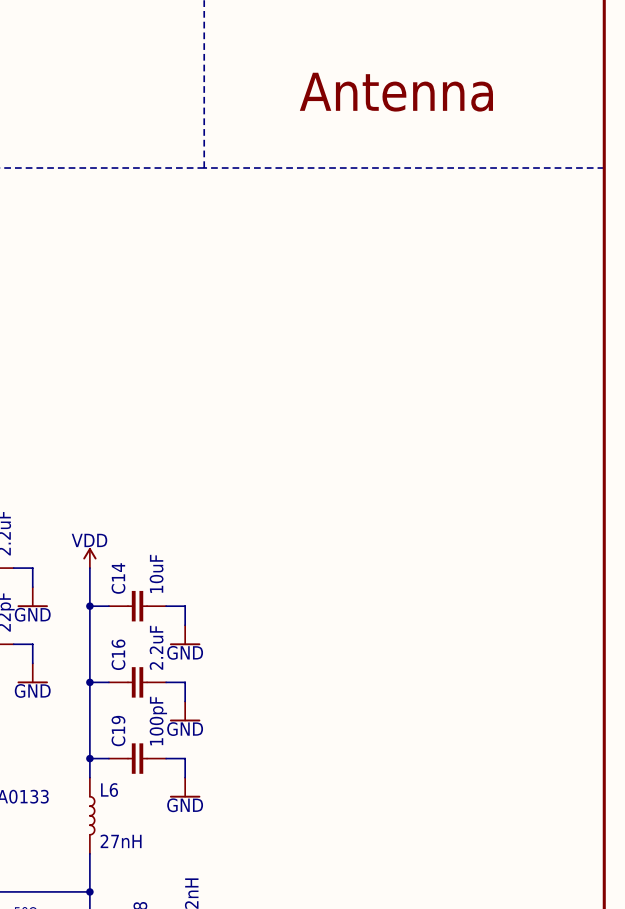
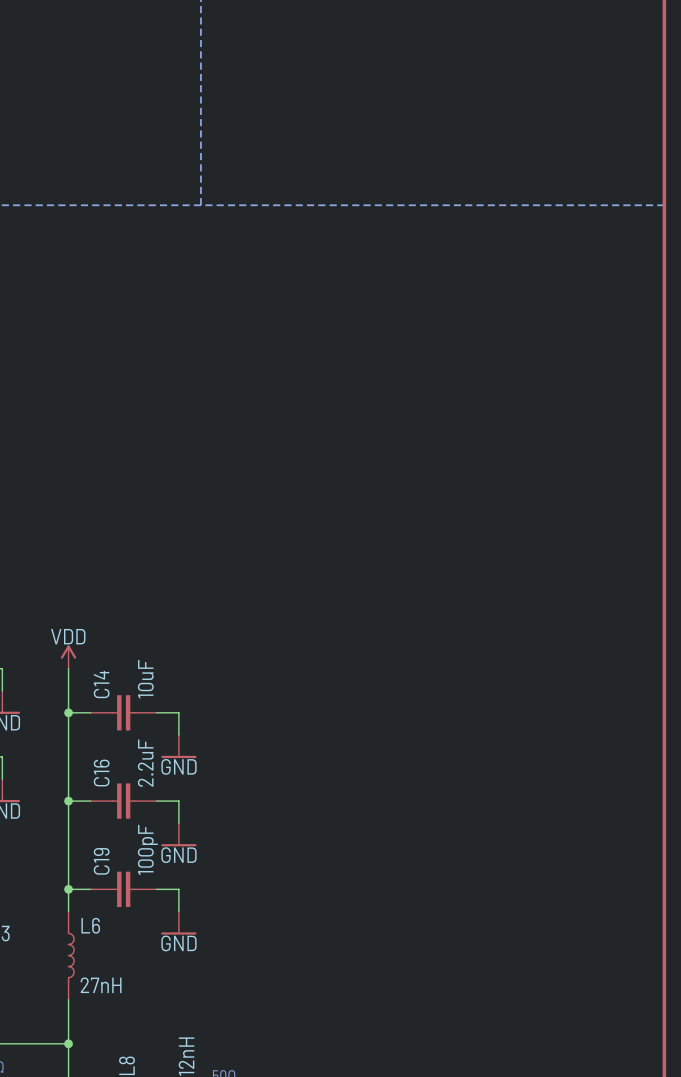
text: Antenna (396, 92) -> none

